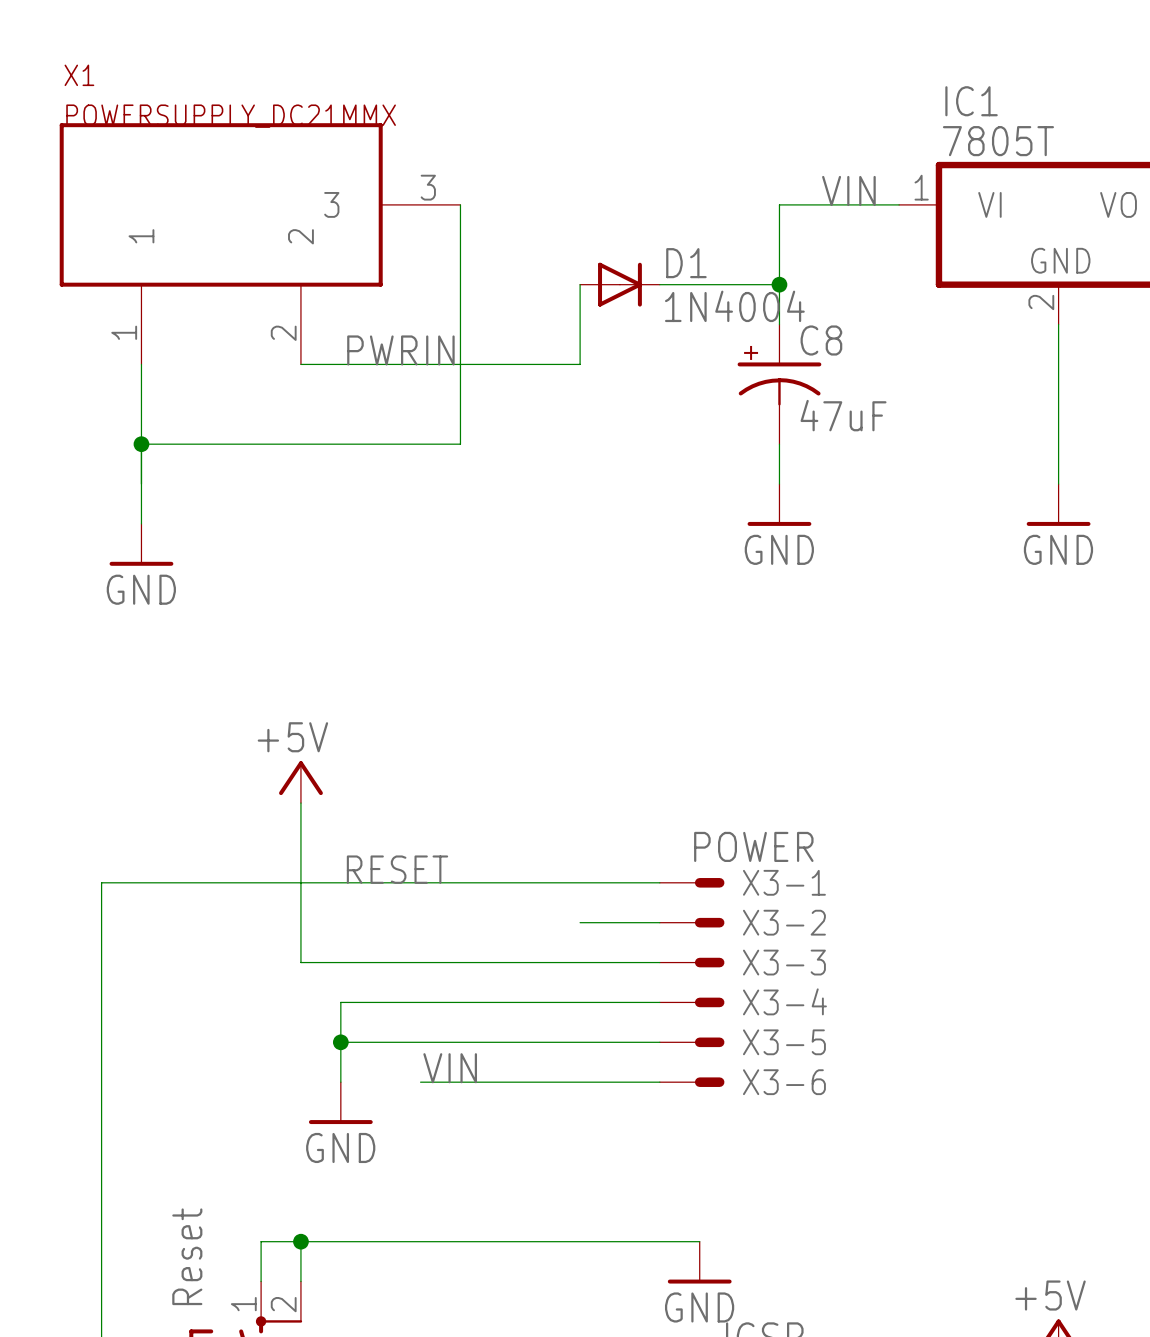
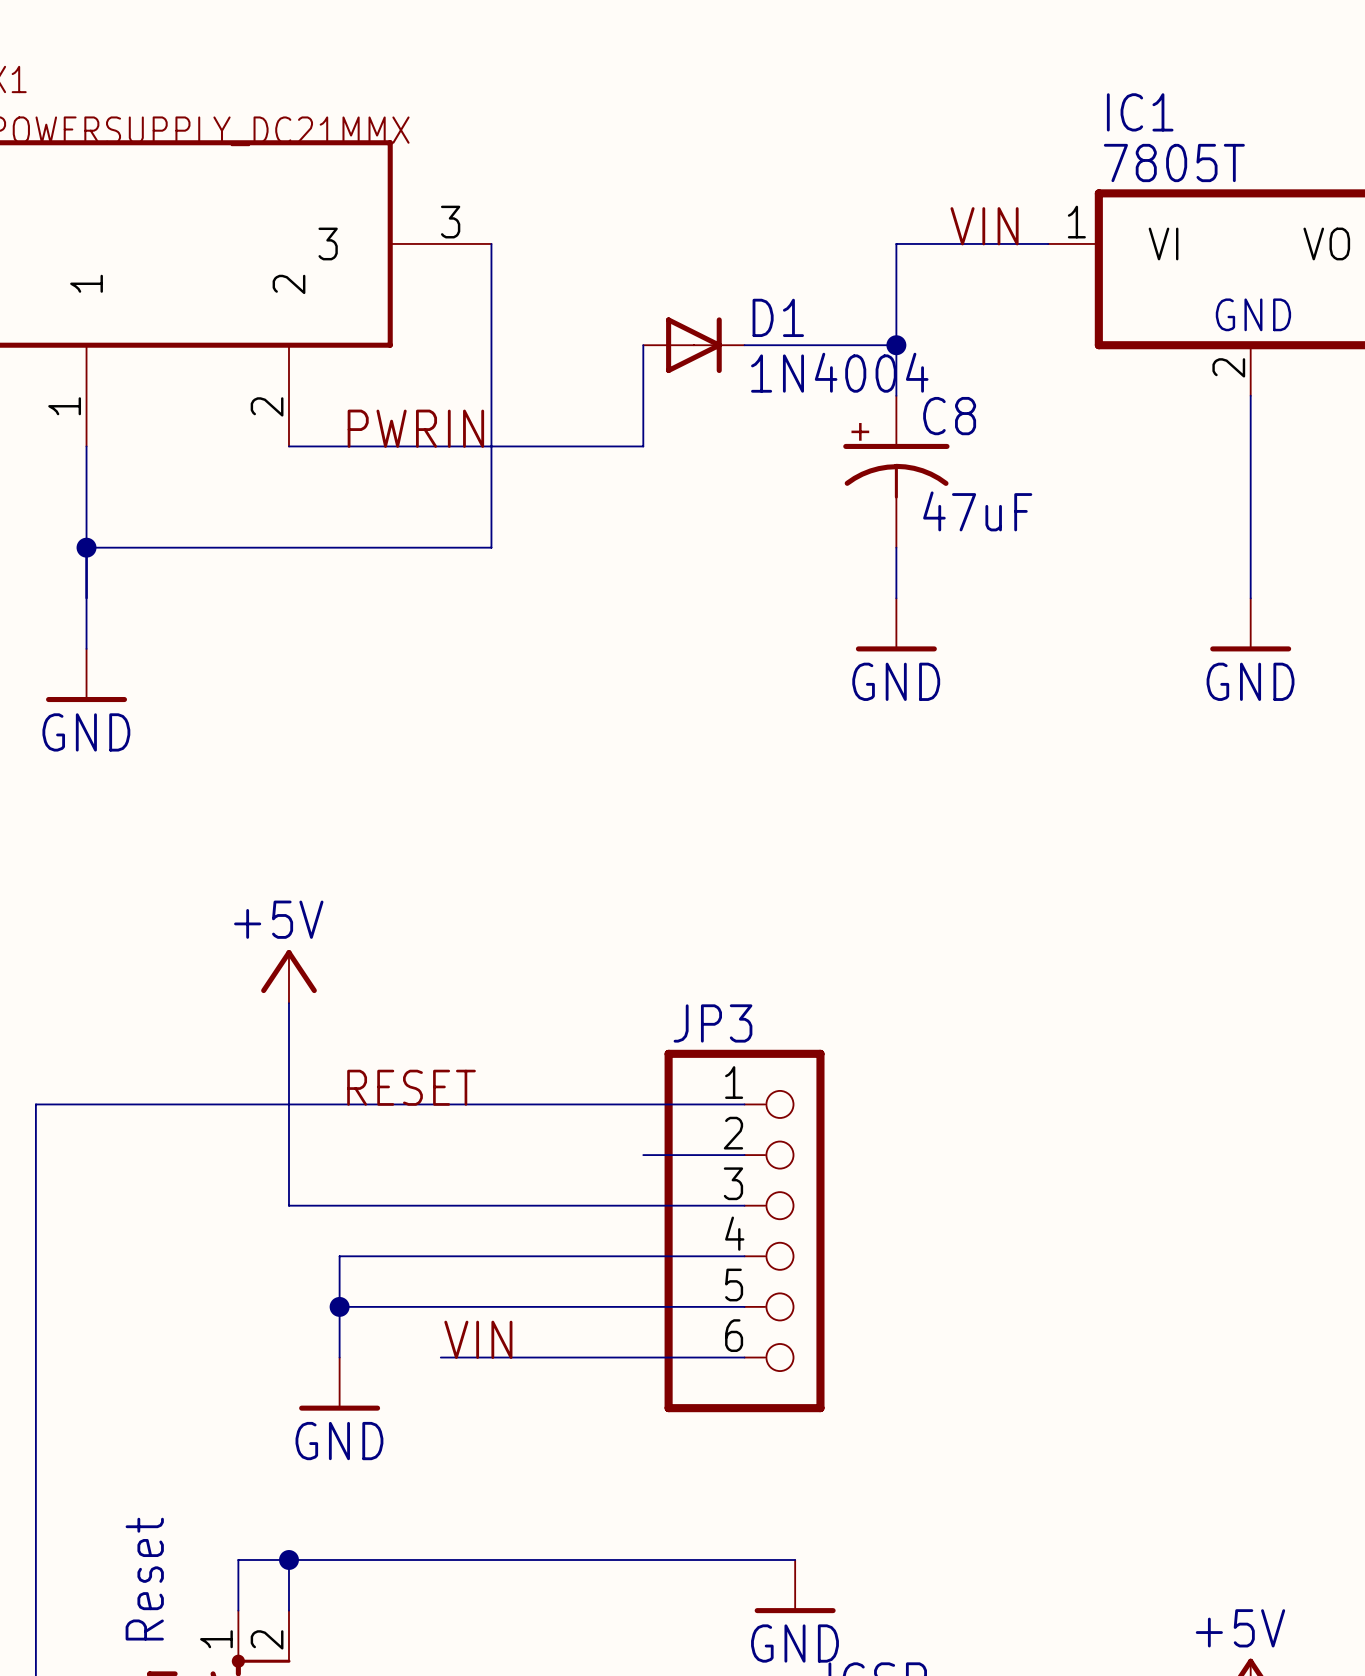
X3-1: POWER (692, 882) -> none
X3-2: (692, 922) -> none
X3-3: (692, 962) -> none
JP3: none -> (744, 1230)
X3-4: (692, 1002) -> none
X3-5: (692, 1042) -> none
X3-6: (692, 1082) -> none

